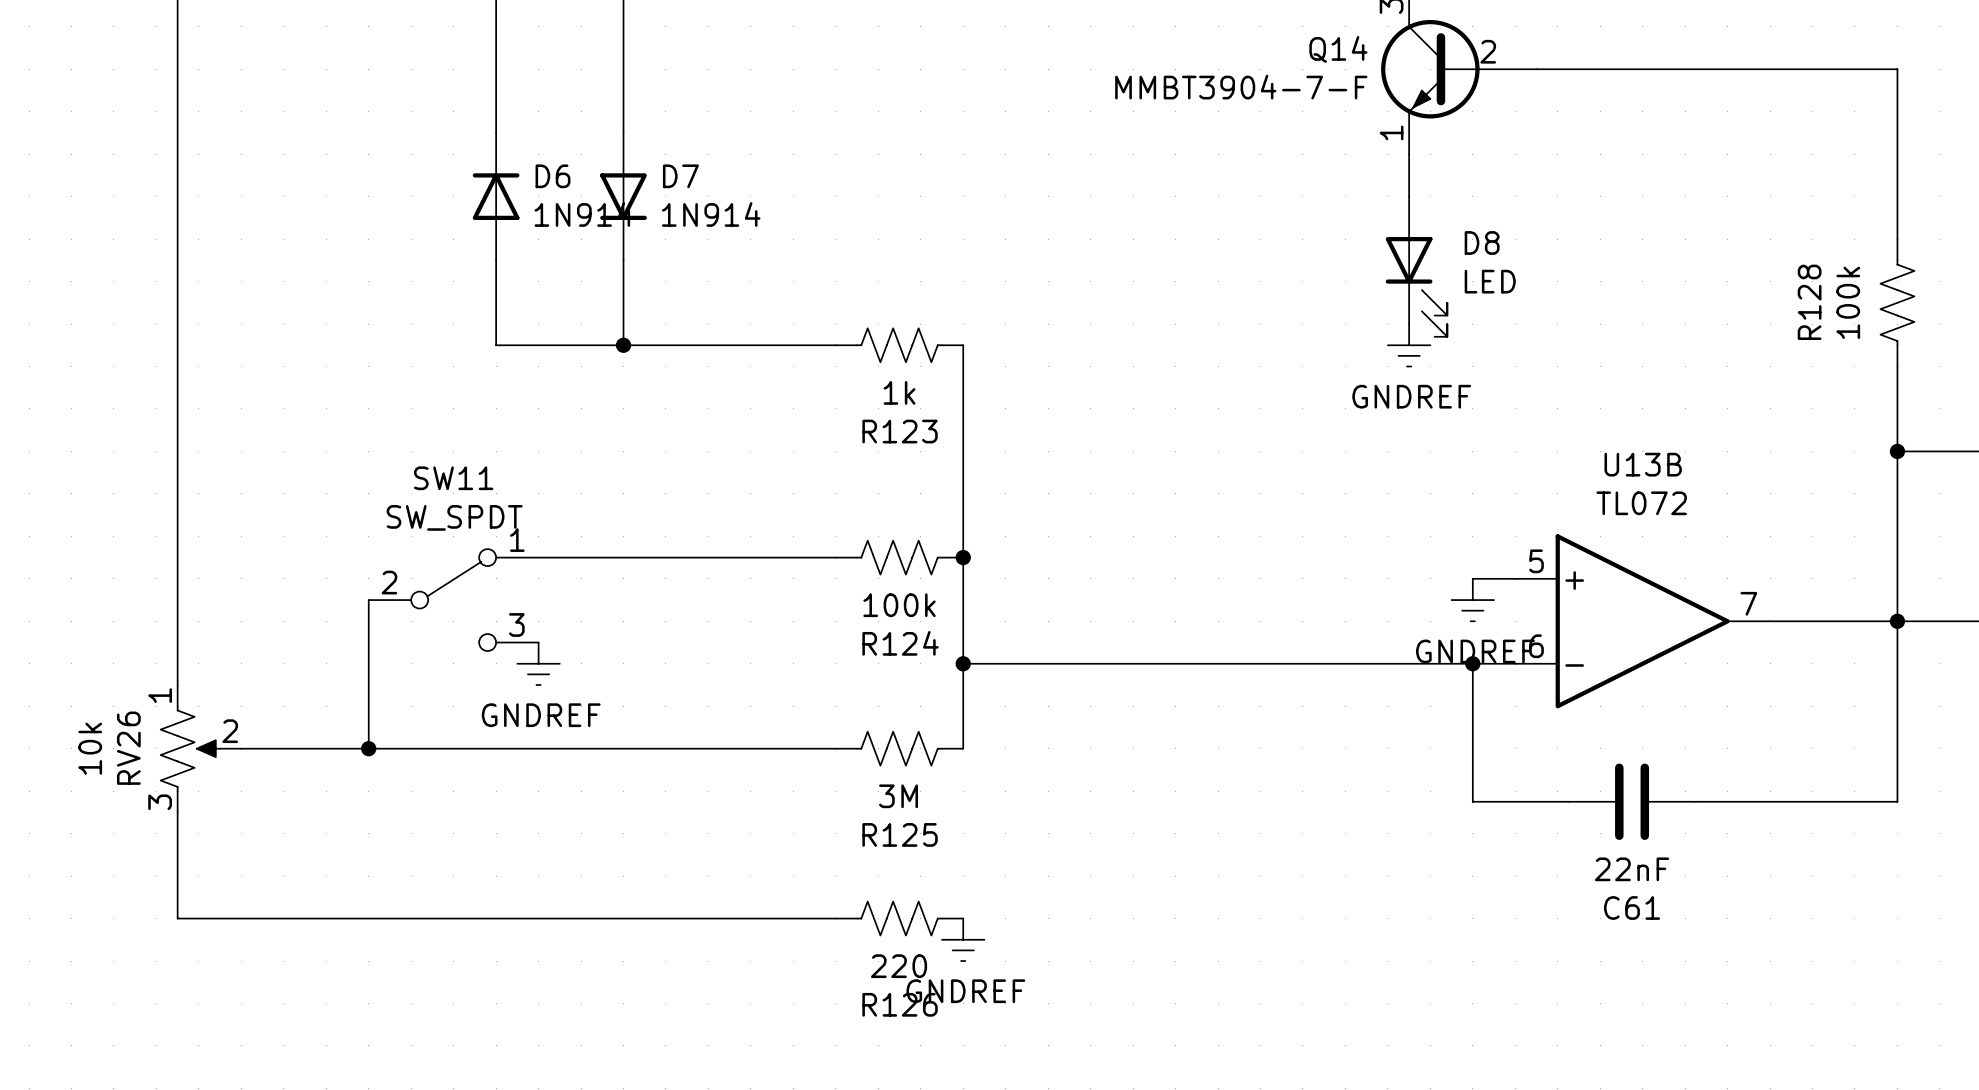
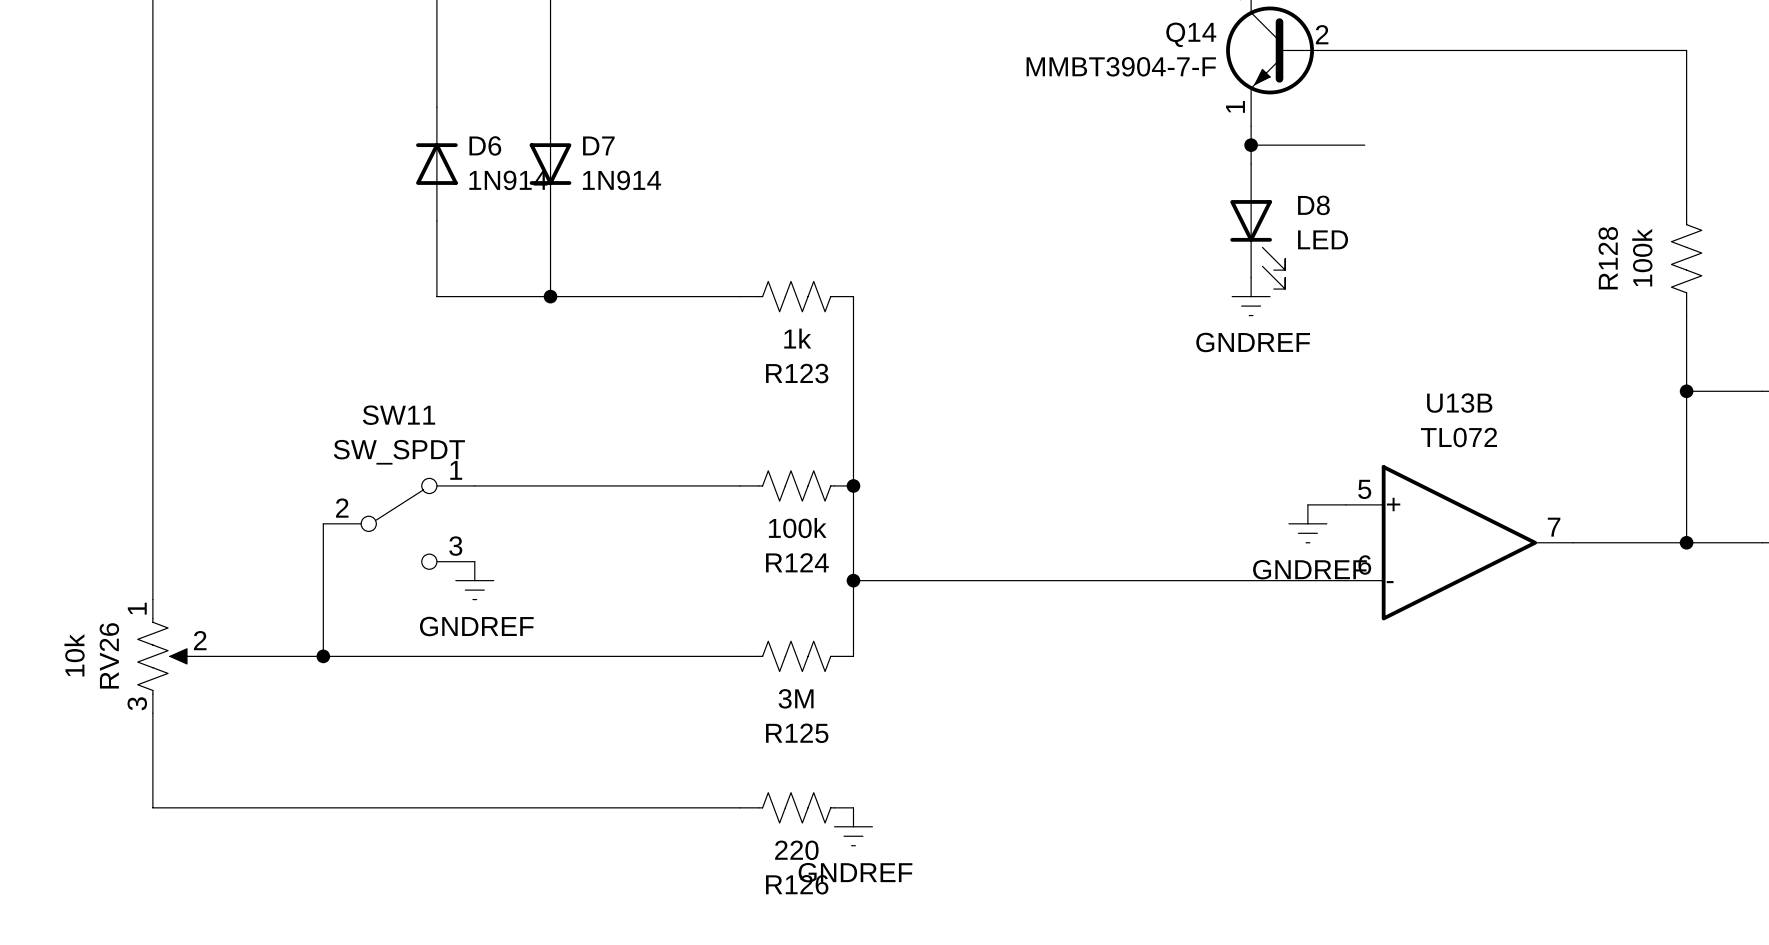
wire: none -> (1251, 145) (1364, 145)
junction: none -> (1251, 145)
wire: (1897, 621) (1897, 801) (1695, 801) -> none
wire: (1472, 663) (1472, 801) (1568, 801) -> none
junction: (1472, 663) -> none
C61: 22nF (1632, 801) -> none

